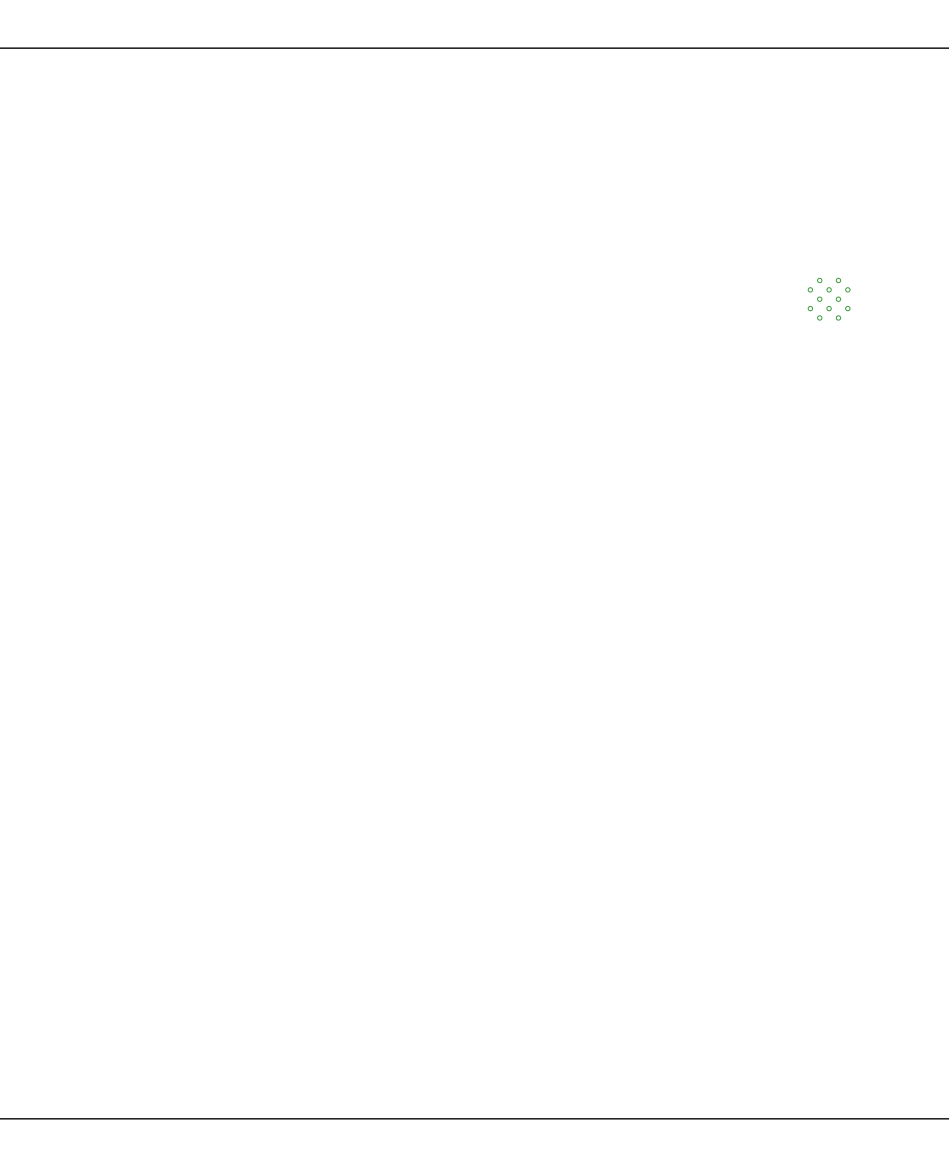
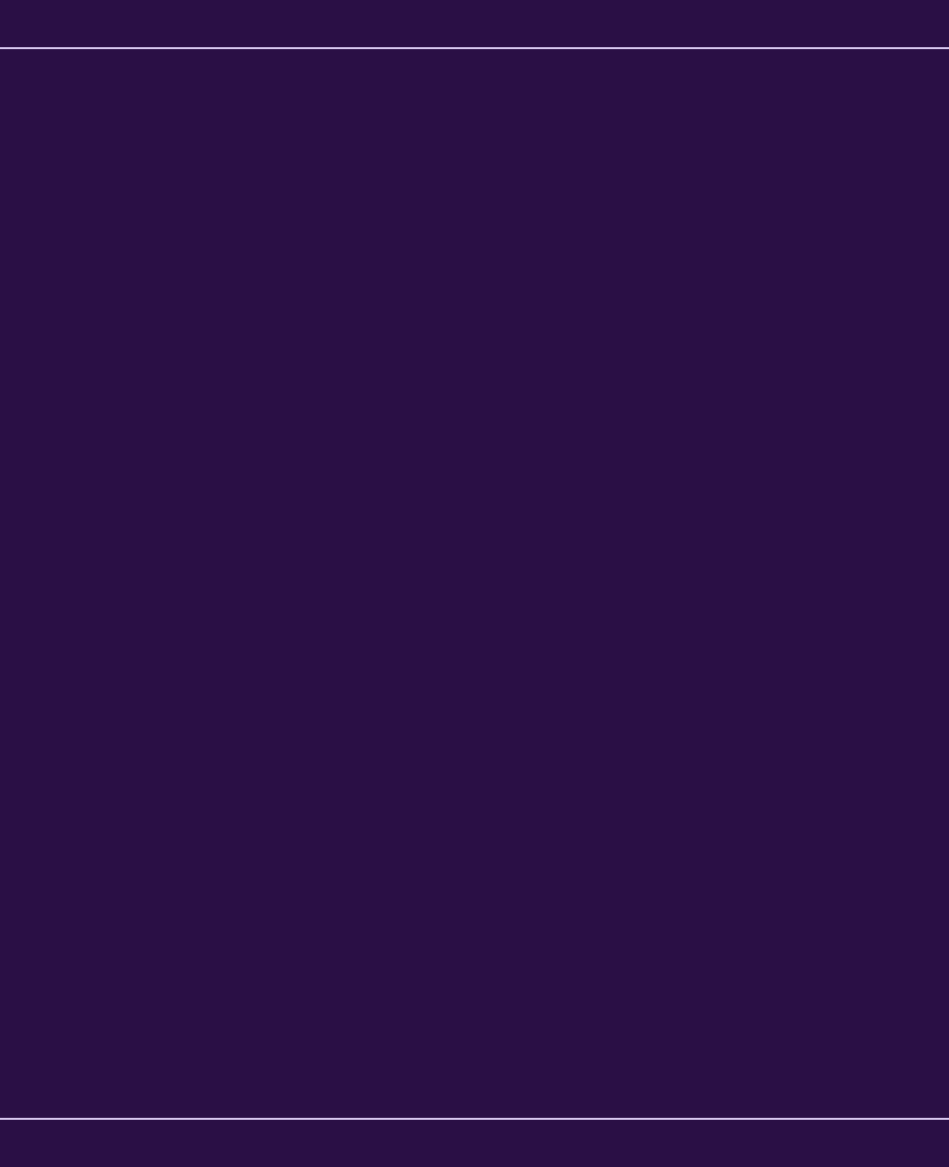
part: (829, 299) -> none

